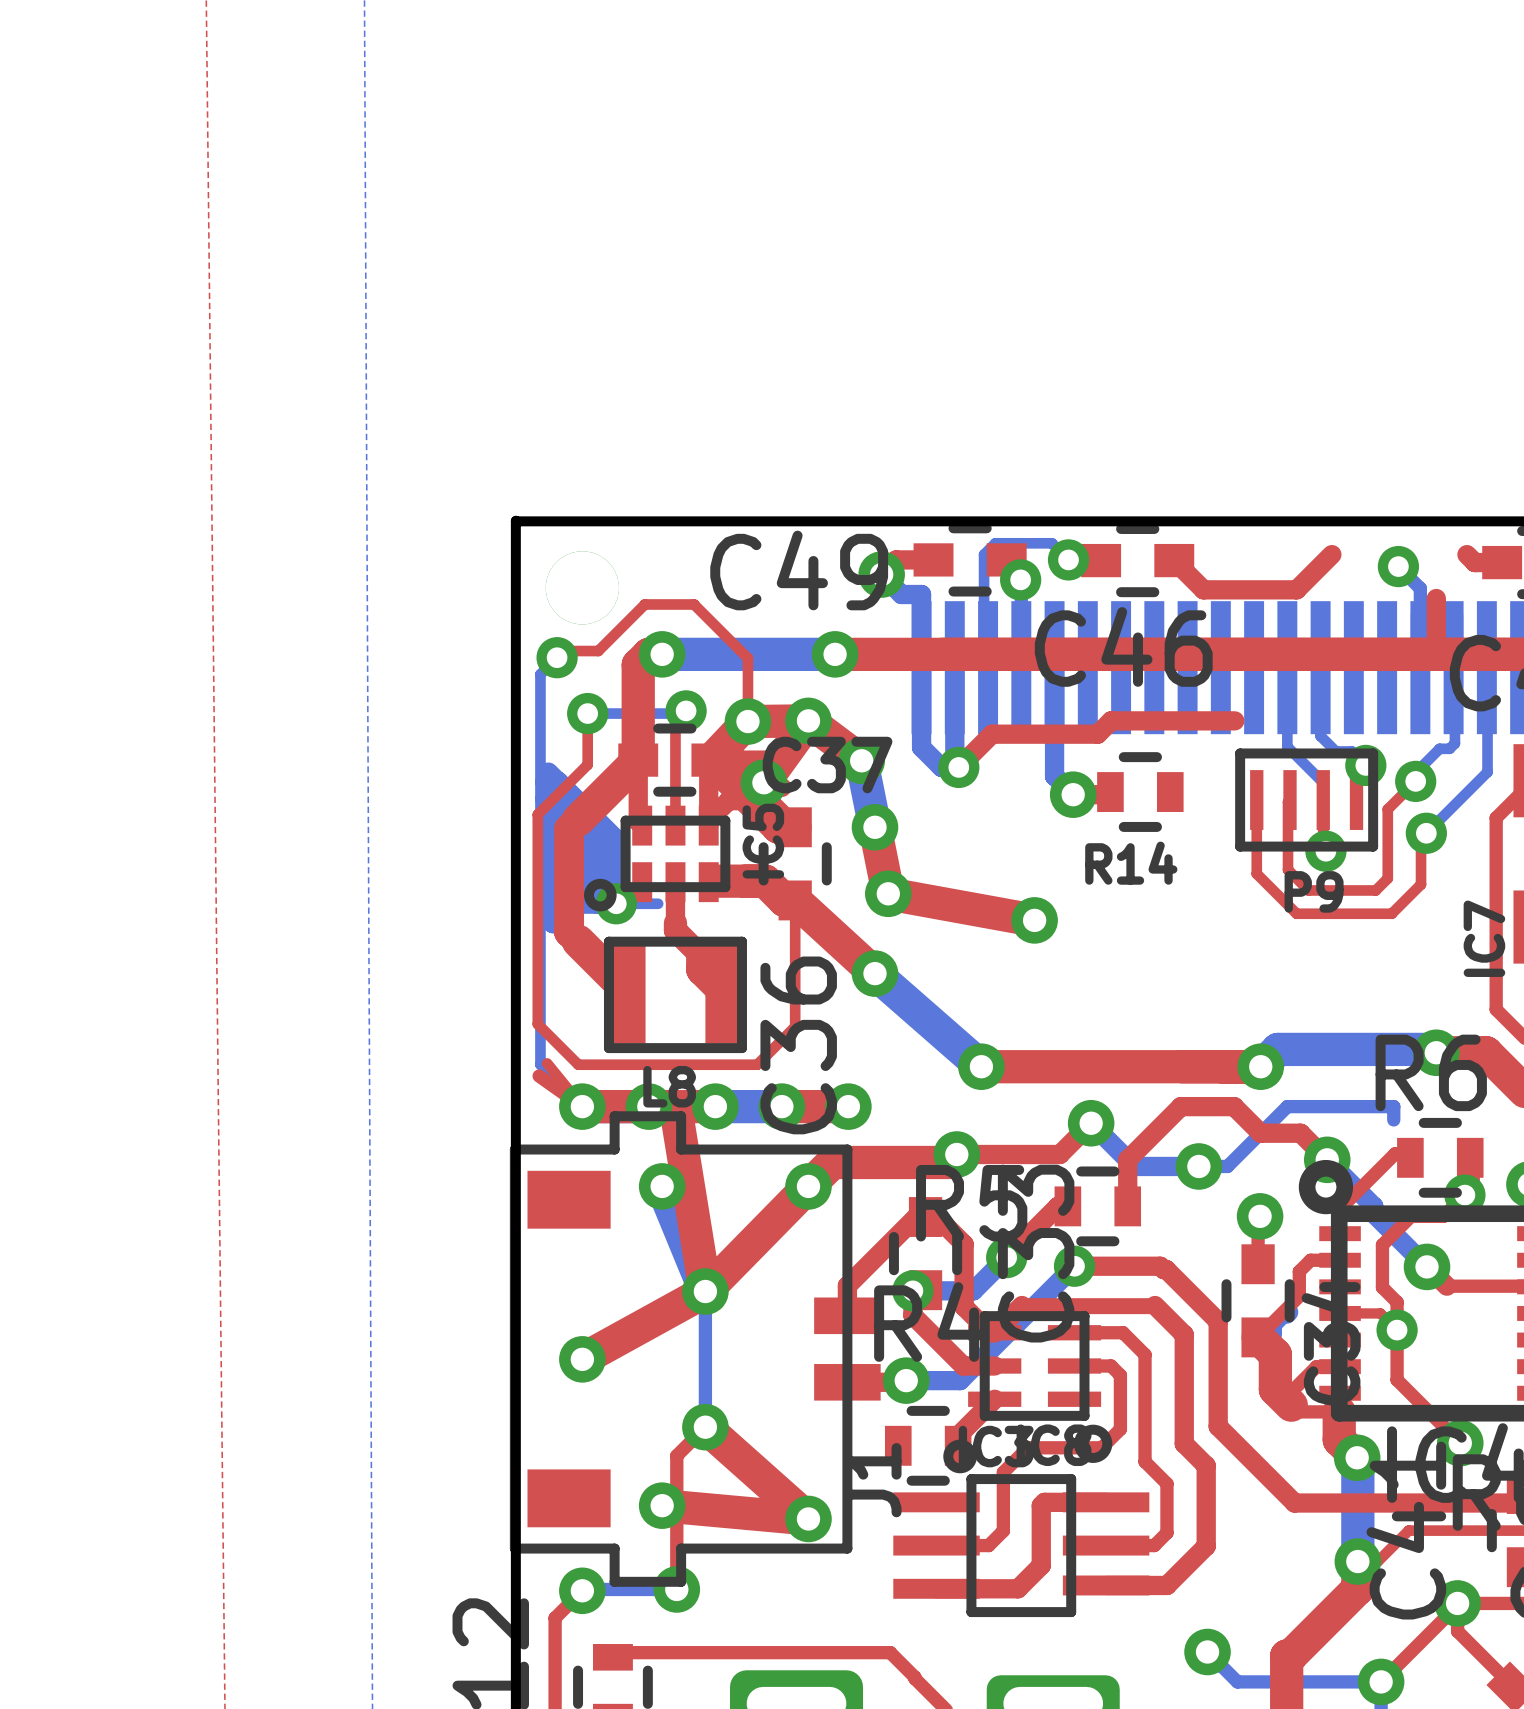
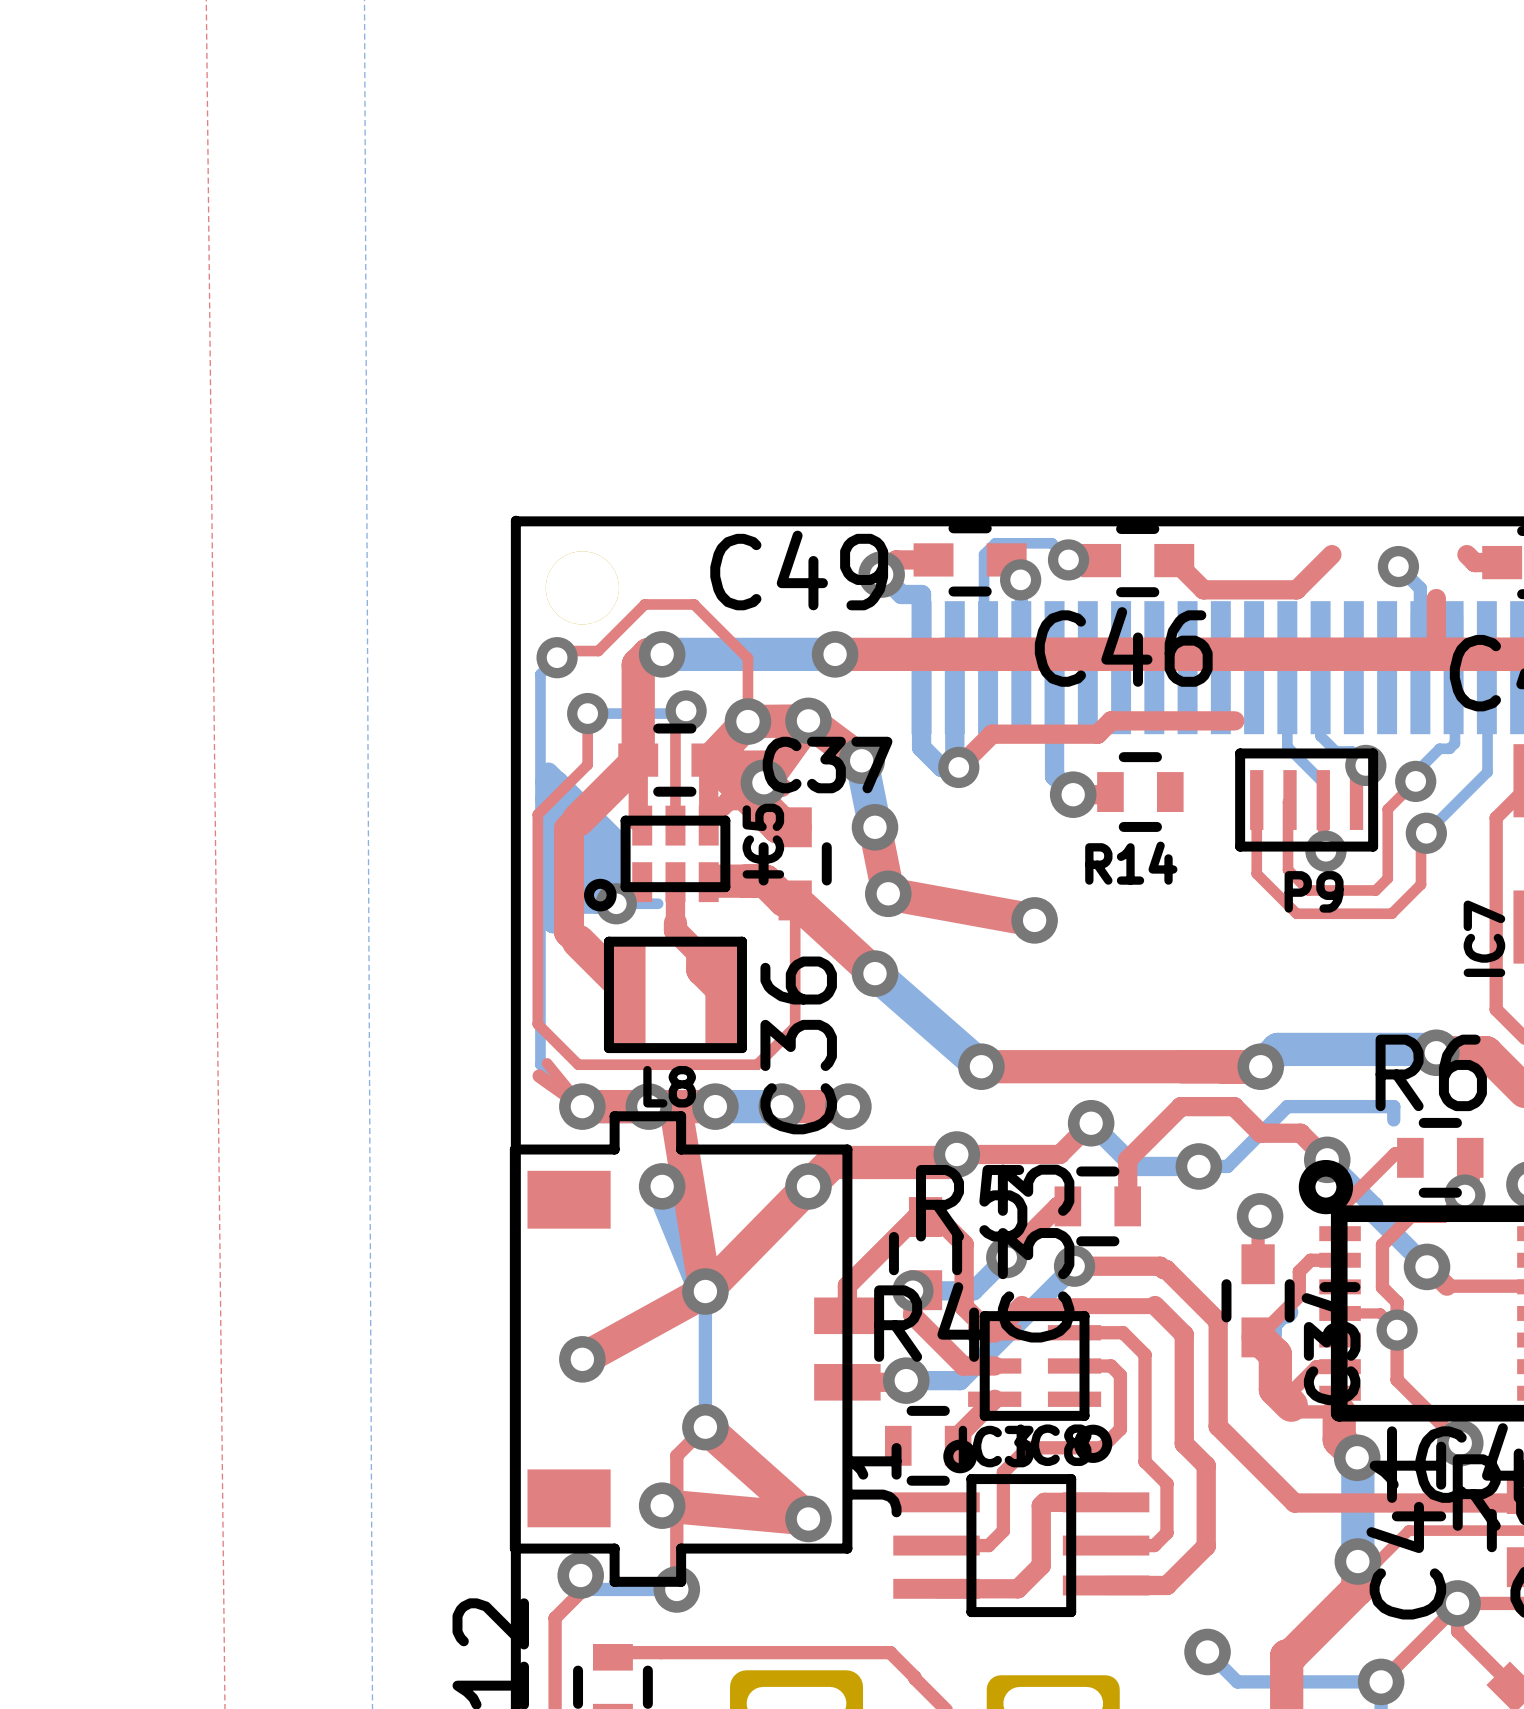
via position: (582, 1590) -> (580, 1575)

